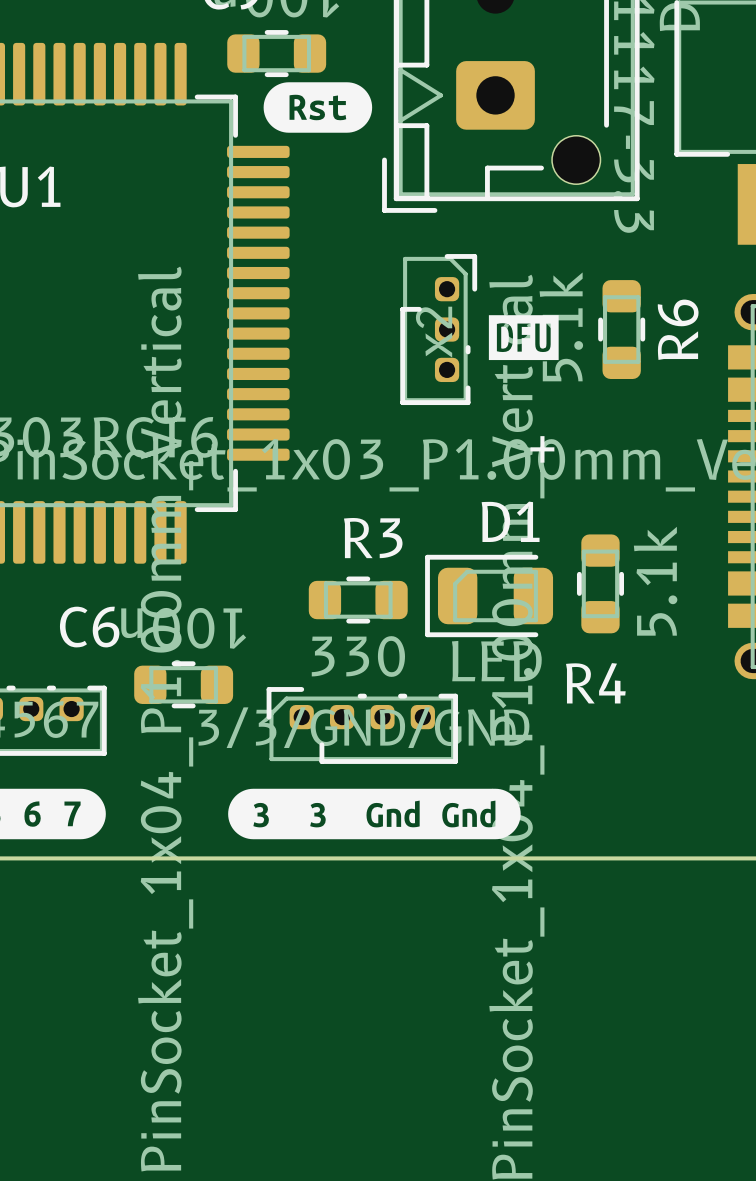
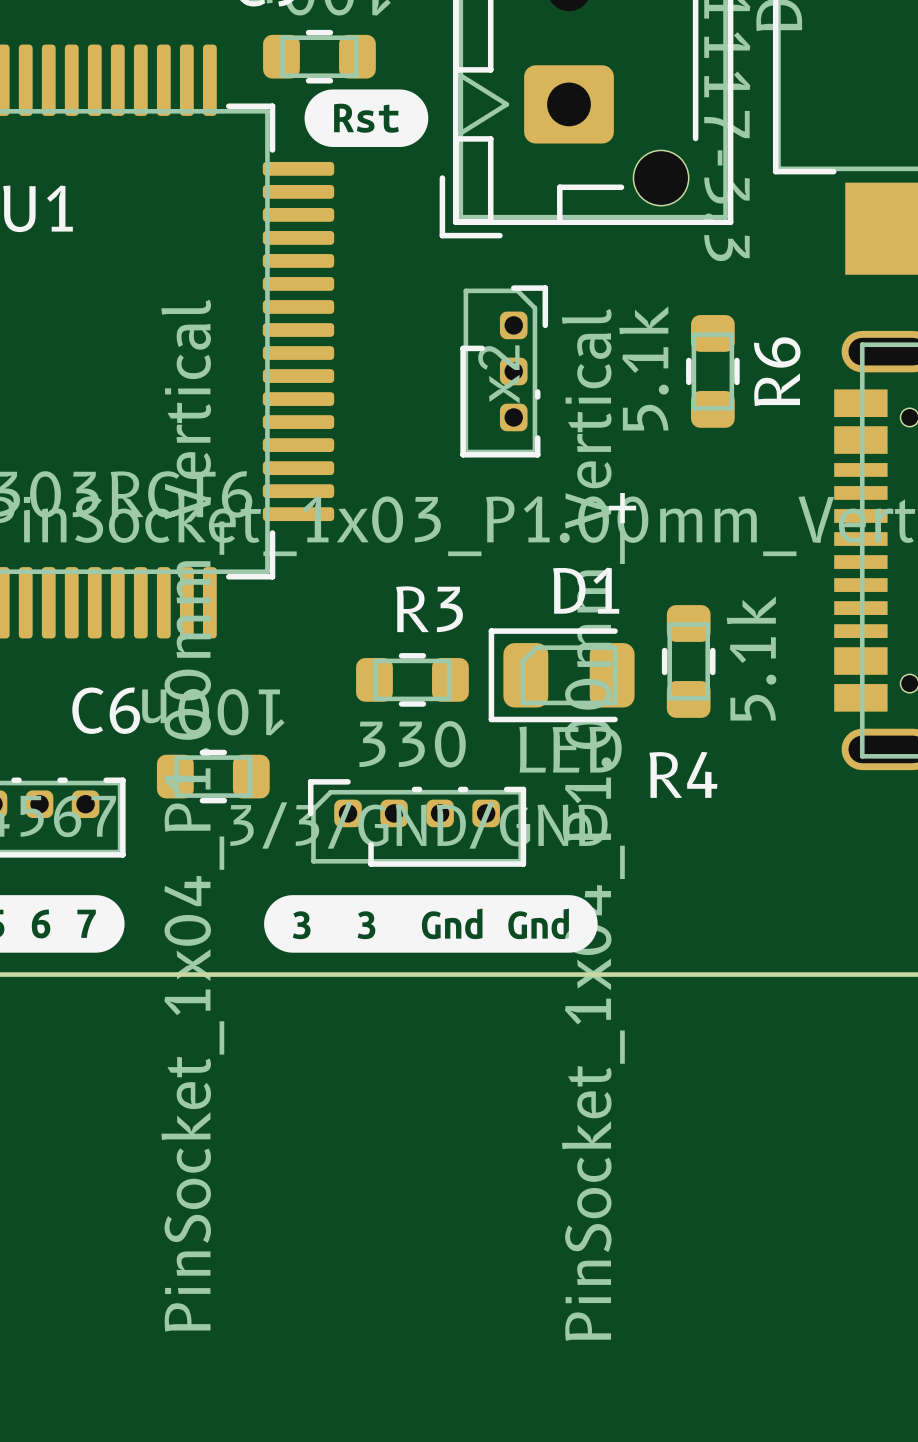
drawing: [488, 315, 559, 361] -> none

